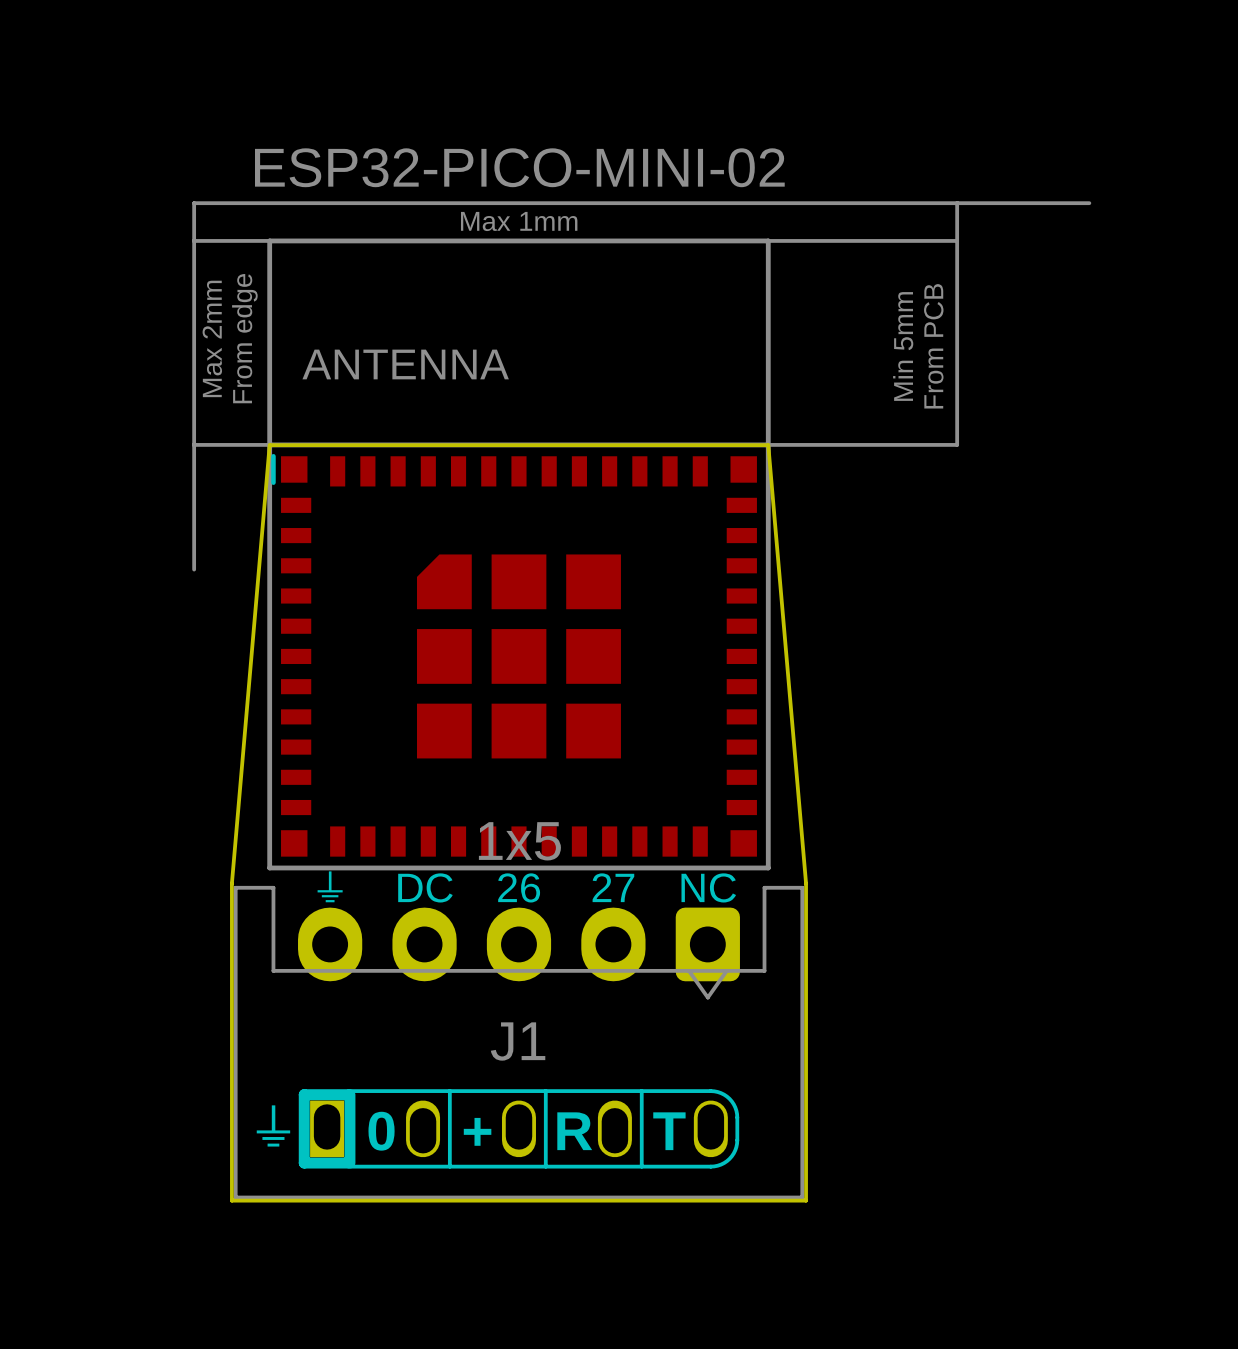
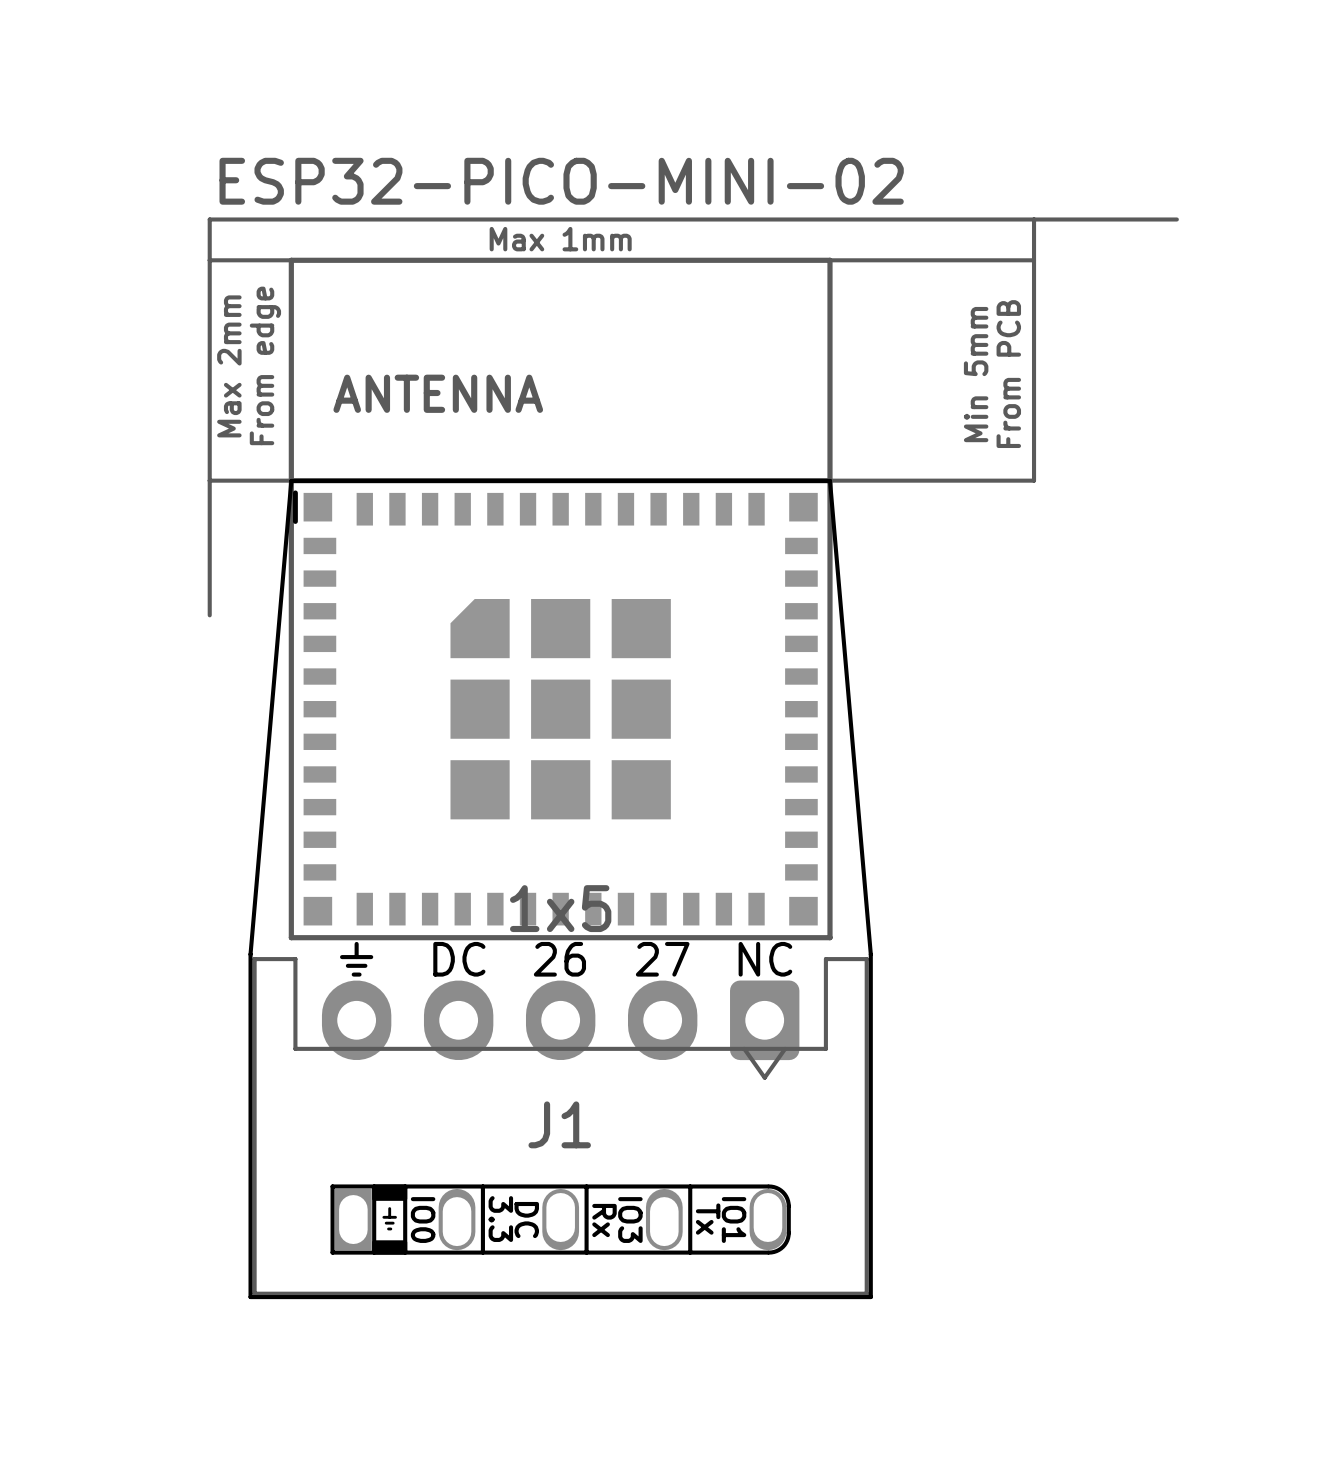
part footprint: [298, 1089, 740, 1169] -> [330, 1184, 791, 1255]

